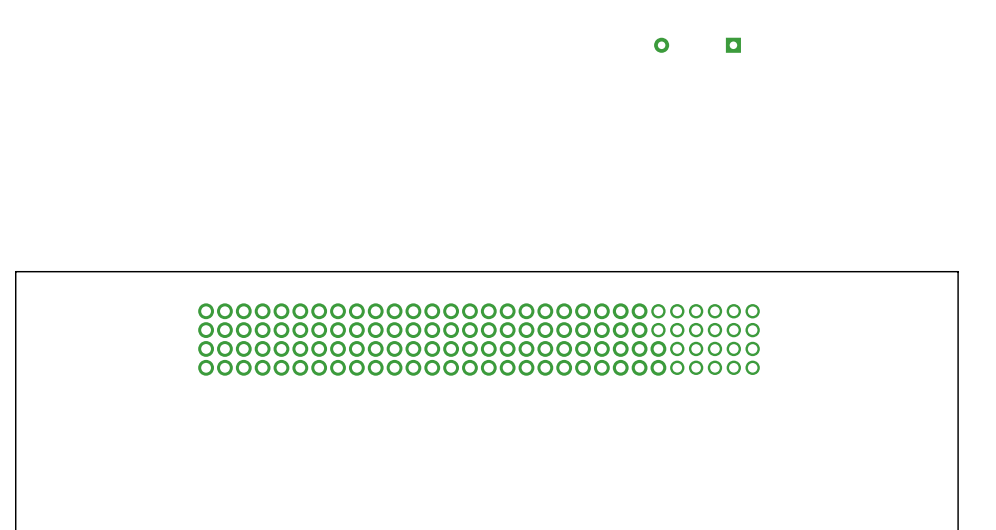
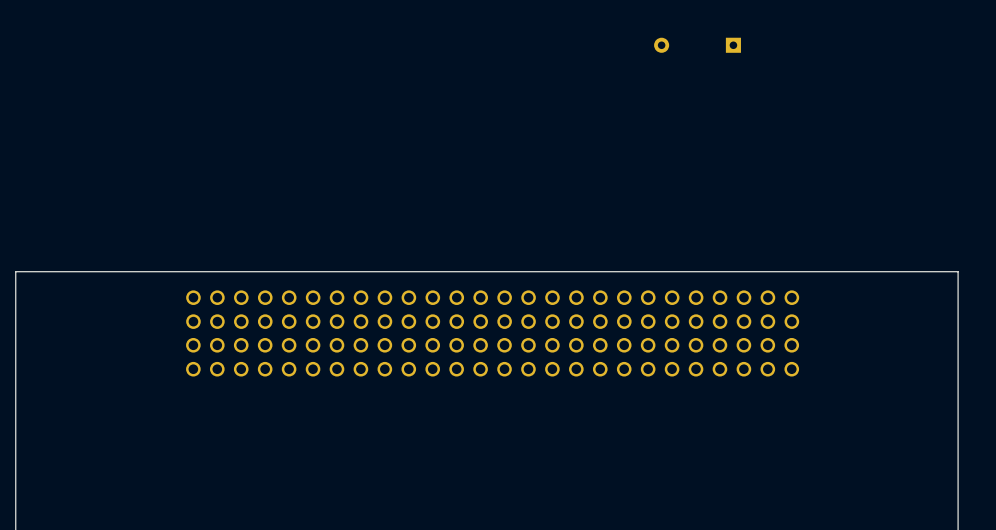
part: none -> (492, 309)
part: (479, 339) -> none
part: none -> (492, 357)

